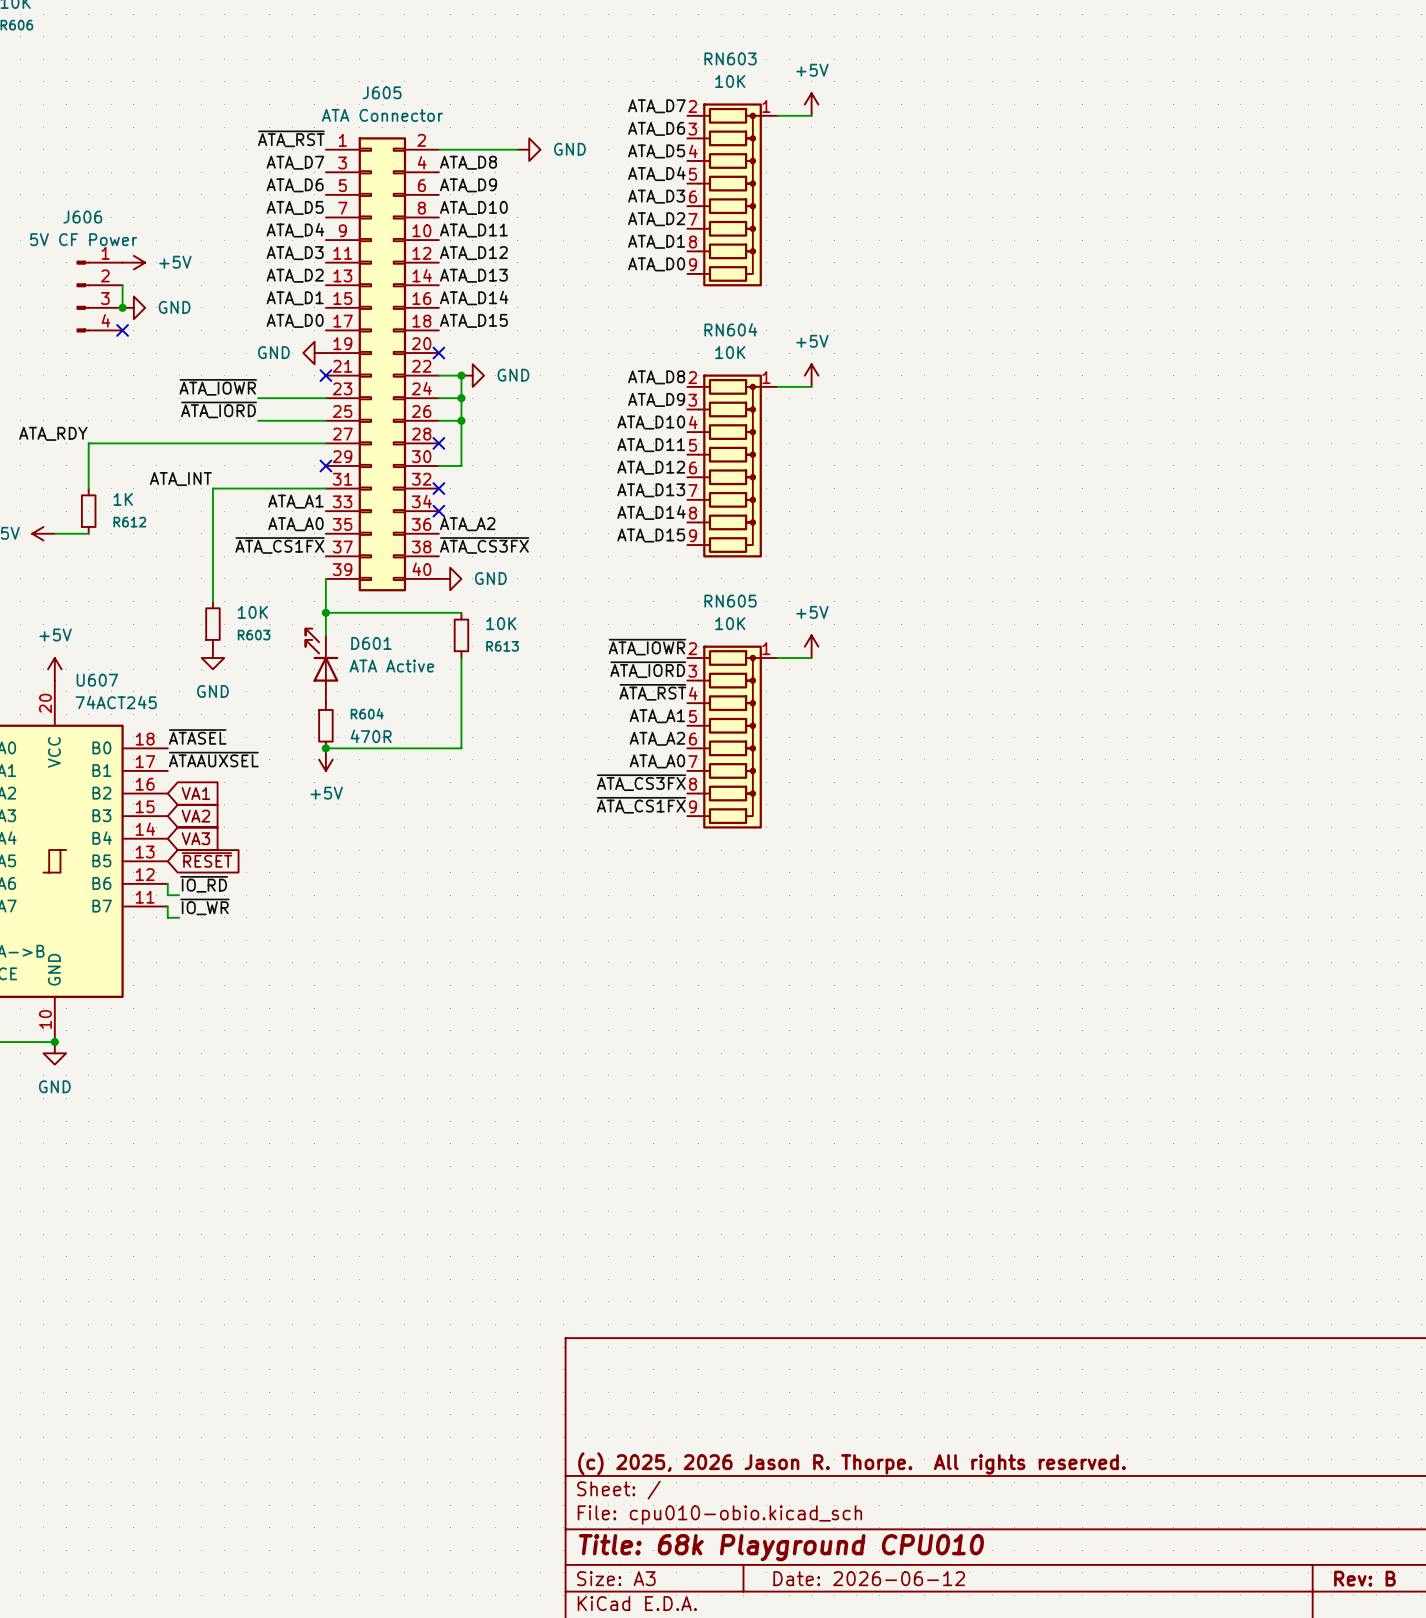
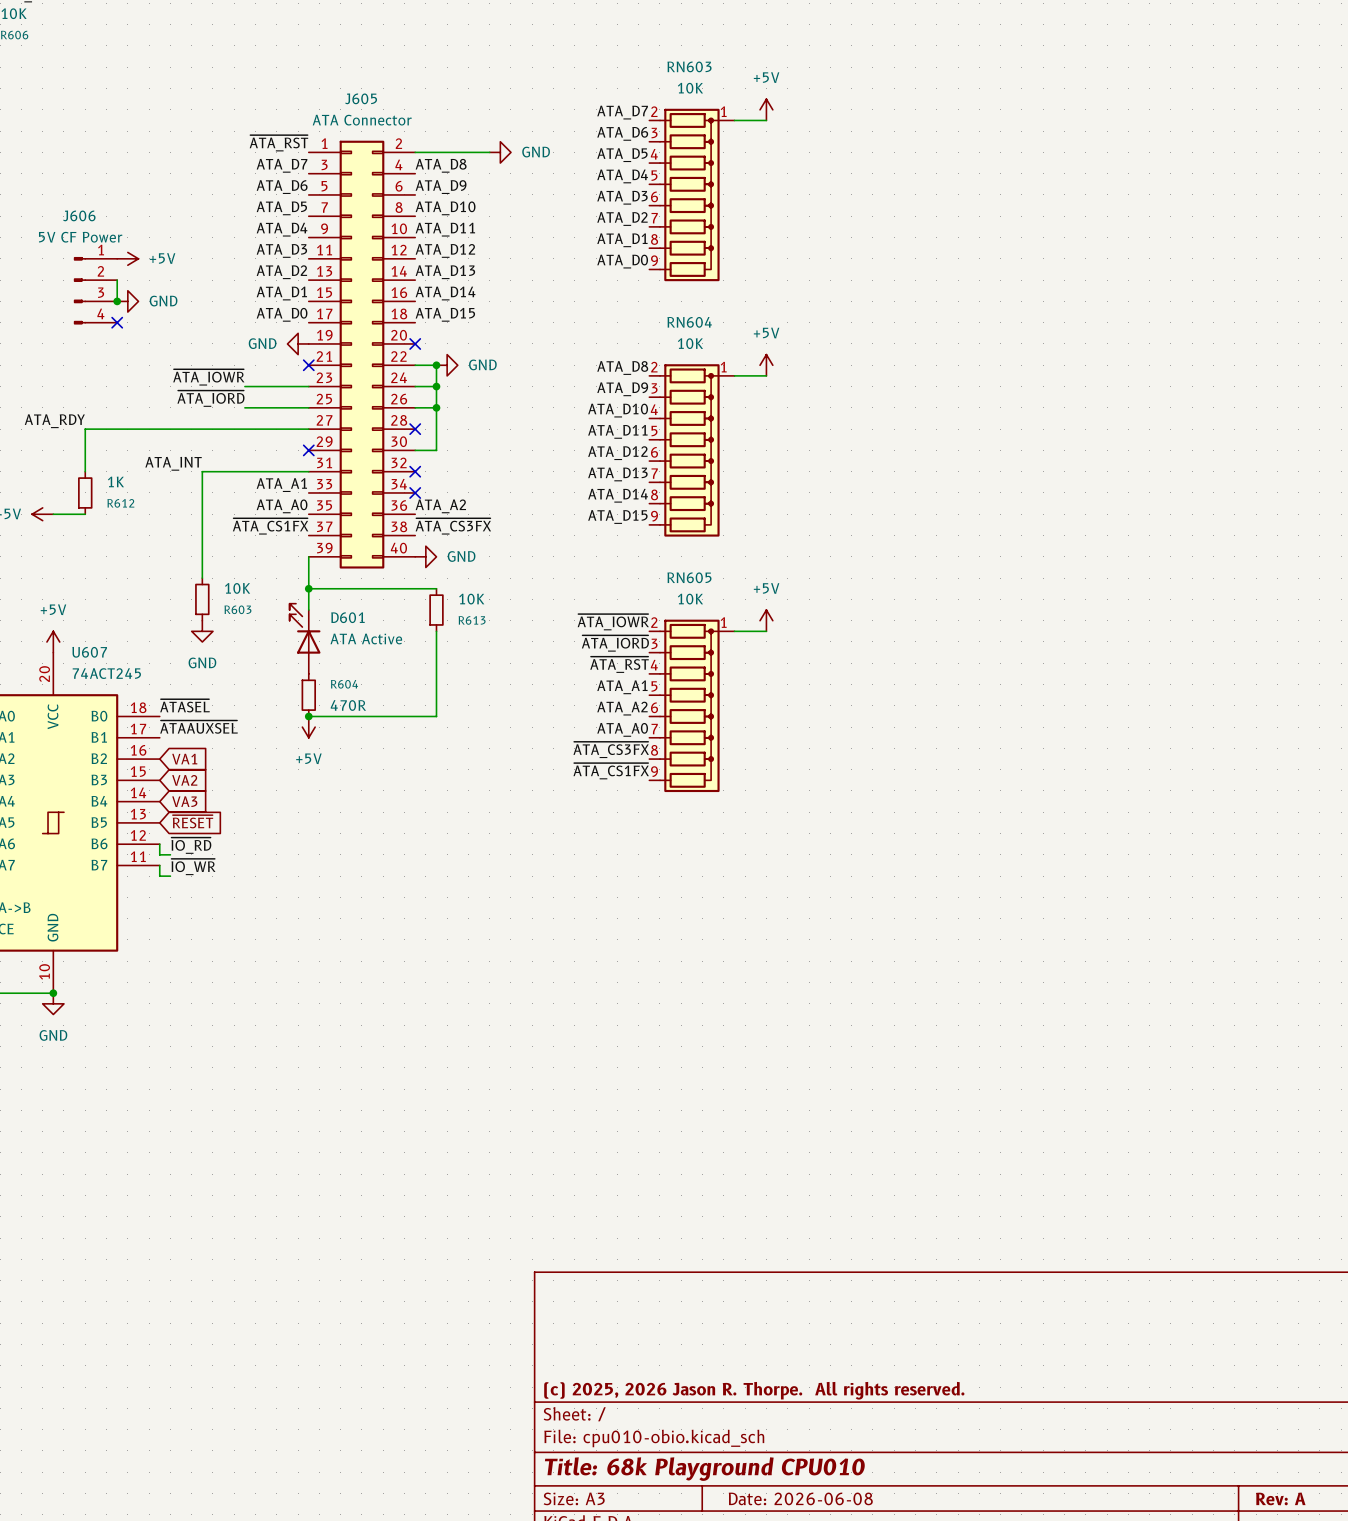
title block: Date: 2026-06-12 (869, 1578) -> Date: 2026-06-08 (800, 1498)
title block: Rev: B (1364, 1578) -> Rev: A (1280, 1498)

